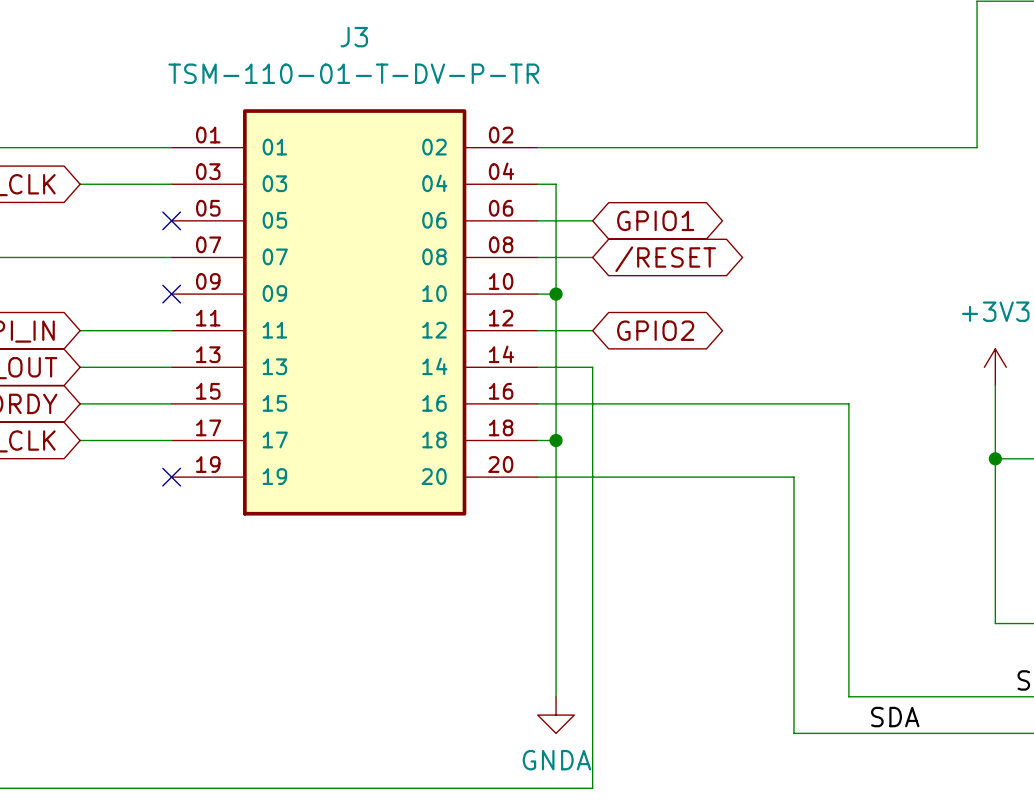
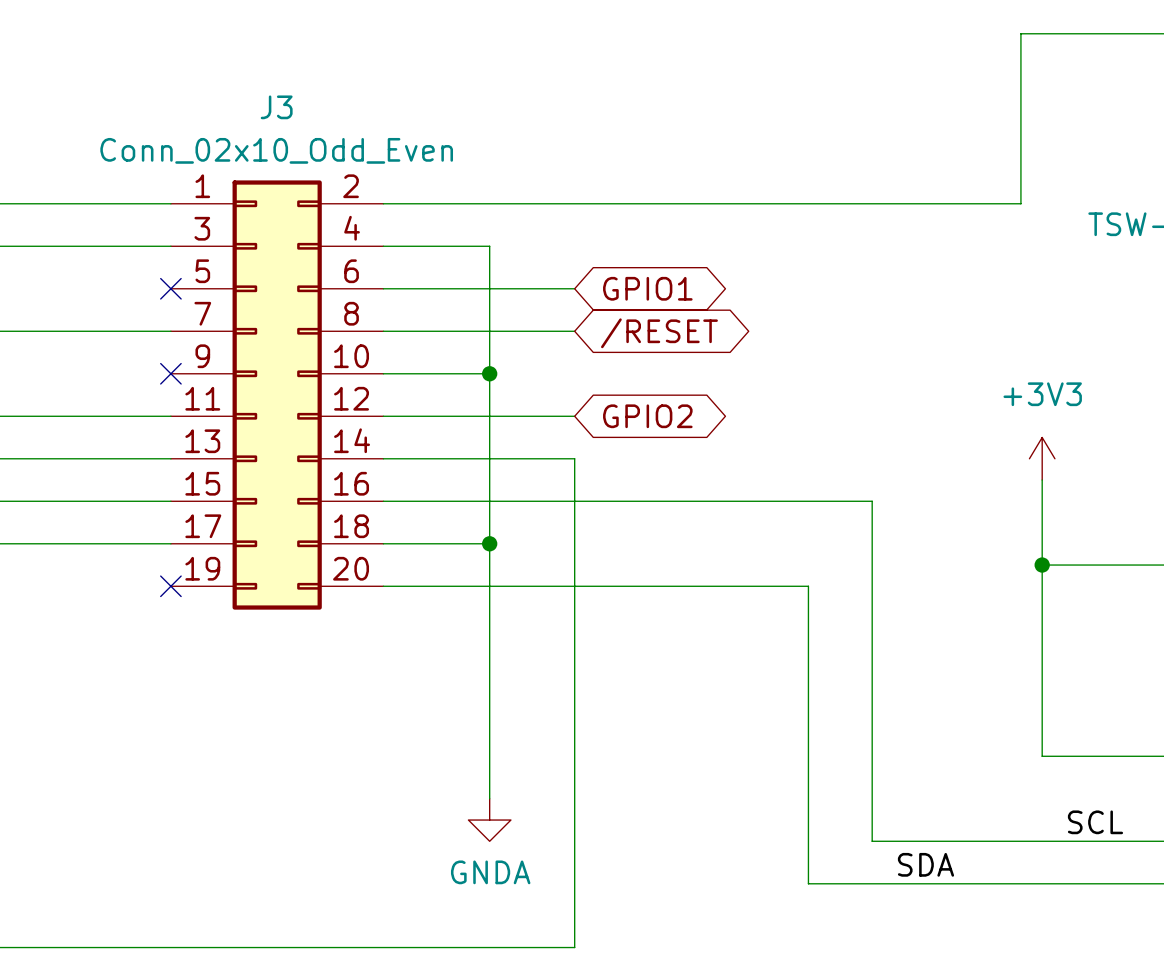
J3 value: TSM-110-01-T-DV-P-TR (353, 73) -> Conn_02x10_Odd_Even (276, 150)
J3 symbol: [171, 109, 538, 516] -> [170, 180, 384, 610]
wire: none -> (383, 246) (489, 246) (489, 798)
wire: (537, 184) (556, 184) (556, 696) -> none
no-connect mark: (171, 220) -> none
no-connect mark: none -> (170, 288)
no-connect mark: (171, 294) -> none
no-connect mark: none -> (170, 373)
wire: (537, 294) (556, 294) -> none
junction position: (556, 294) -> (489, 373)
wire: (537, 440) (556, 440) -> none
junction position: (556, 440) -> (489, 543)
no-connect mark position: (171, 477) -> (170, 586)
power symbol position: GNDA (556, 715) -> GNDA (489, 820)

